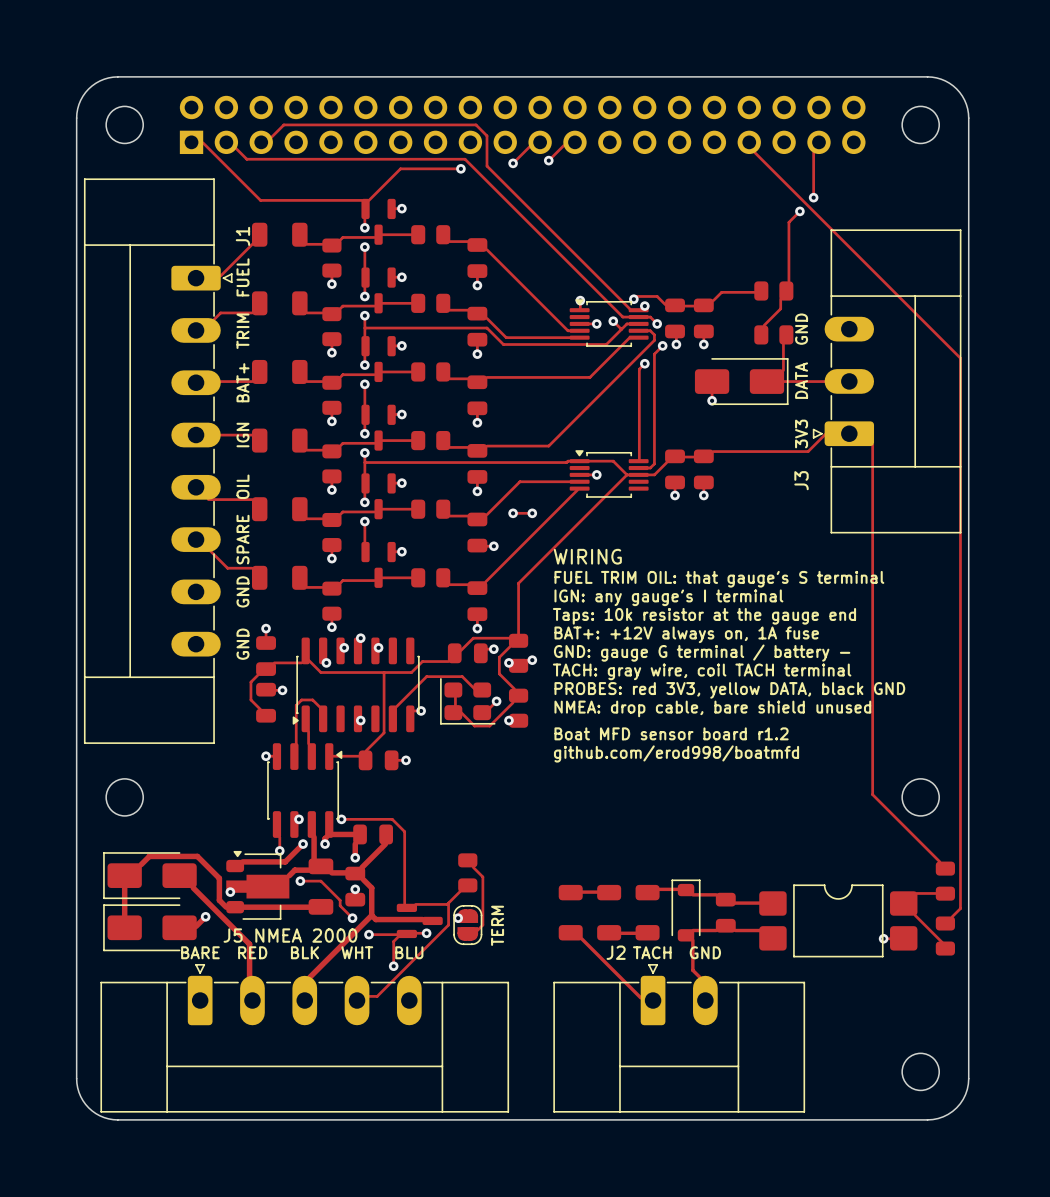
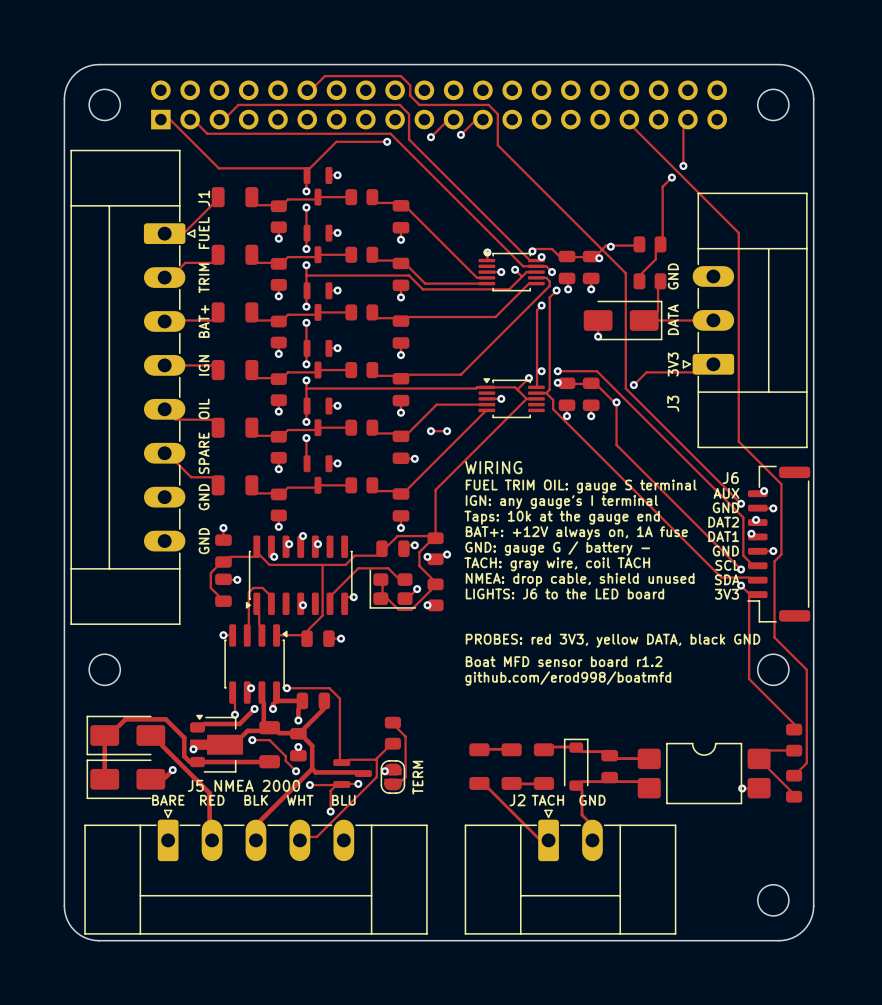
track: none -> (315, 85) (324, 76) (400, 76) (410, 85) (410, 95) (419, 104) (488, 104) (497, 114) (497, 145) (625, 273) (625, 388) (741, 503)
track: (879, 277) (960, 358) (960, 797) -> (738, 232) (738, 441) (781, 484) (781, 554) (774, 561) (774, 637) (806, 669)
via: none -> (610, 246)
via: none -> (599, 258)
track: (825, 433) (808, 451) (713, 451) -> none
via: none -> (541, 371)
track: none -> (557, 371) (596, 371) (743, 517) (743, 555) (750, 562)
via: none -> (557, 371)
track: none -> (693, 372) (646, 372) (633, 385)
track: (872, 444) (872, 794) (939, 861) -> none
track: none -> (528, 378) (517, 389)
via: none -> (528, 378)
via: none -> (557, 382)
via: none -> (633, 385)
track: none -> (599, 387) (614, 402) (616, 402) (616, 445) (741, 569)
track: (666, 462) (654, 474) (647, 474) -> none
track: none -> (546, 393) (553, 400) (553, 409) (721, 577) (749, 577)
via: none -> (616, 402)
text: none -> J6 (730, 478)
text: FUEL TRIM OIL: that gauge's S terminal (719, 579) -> FUEL TRIM OIL: gauge S terminal (581, 486)
via: none -> (764, 491)
text: none -> AUX (726, 493)
via: none -> (741, 503)
text: none -> GND (725, 507)
track: none -> (767, 508) (773, 508)
via: none -> (773, 508)
text: Taps: 10k resistor at the gauge end (704, 616) -> Taps: 10k at the gauge end (562, 517)
via: none -> (756, 519)
text: none -> DAT2 (723, 522)
via: none -> (751, 533)
text: none -> DAT1 (723, 536)
part: none -> (778, 544)
text: GND: gauge G terminal / battery - (702, 653) -> GND: gauge G / battery - (557, 548)
text: none -> GND (725, 551)
track: none -> (767, 551) (773, 551)
via: none -> (773, 551)
text: TACH: gray wire, coil TACH terminal (702, 671) -> TACH: gray wire, coil TACH (557, 564)
text: none -> SCL (727, 565)
via: none -> (741, 569)
text: PROBES: red 3V3, yellow DATA, black GND (729, 690) -> NMEA: drop cable, shield unused (580, 579)
text: none -> SDA (727, 579)
track: none -> (741, 585) (749, 593)
via: none -> (741, 585)
text: none -> 3V3 (726, 594)
text: NMEA: drop cable, bare shield unused (712, 708) -> LIGHTS: J6 to the LED board (564, 593)
track: none -> (749, 597) (749, 679) (794, 723)
text position: Boat MFD sensor board r1.2 (671, 733) -> Boat MFD sensor board r1.2 (564, 661)
text position: github.com/erod998/boatmfd (676, 753) -> github.com/erod998/boatmfd (568, 678)
text: none -> PROBES: red 3V3, yellow DATA, black GND (613, 640)

